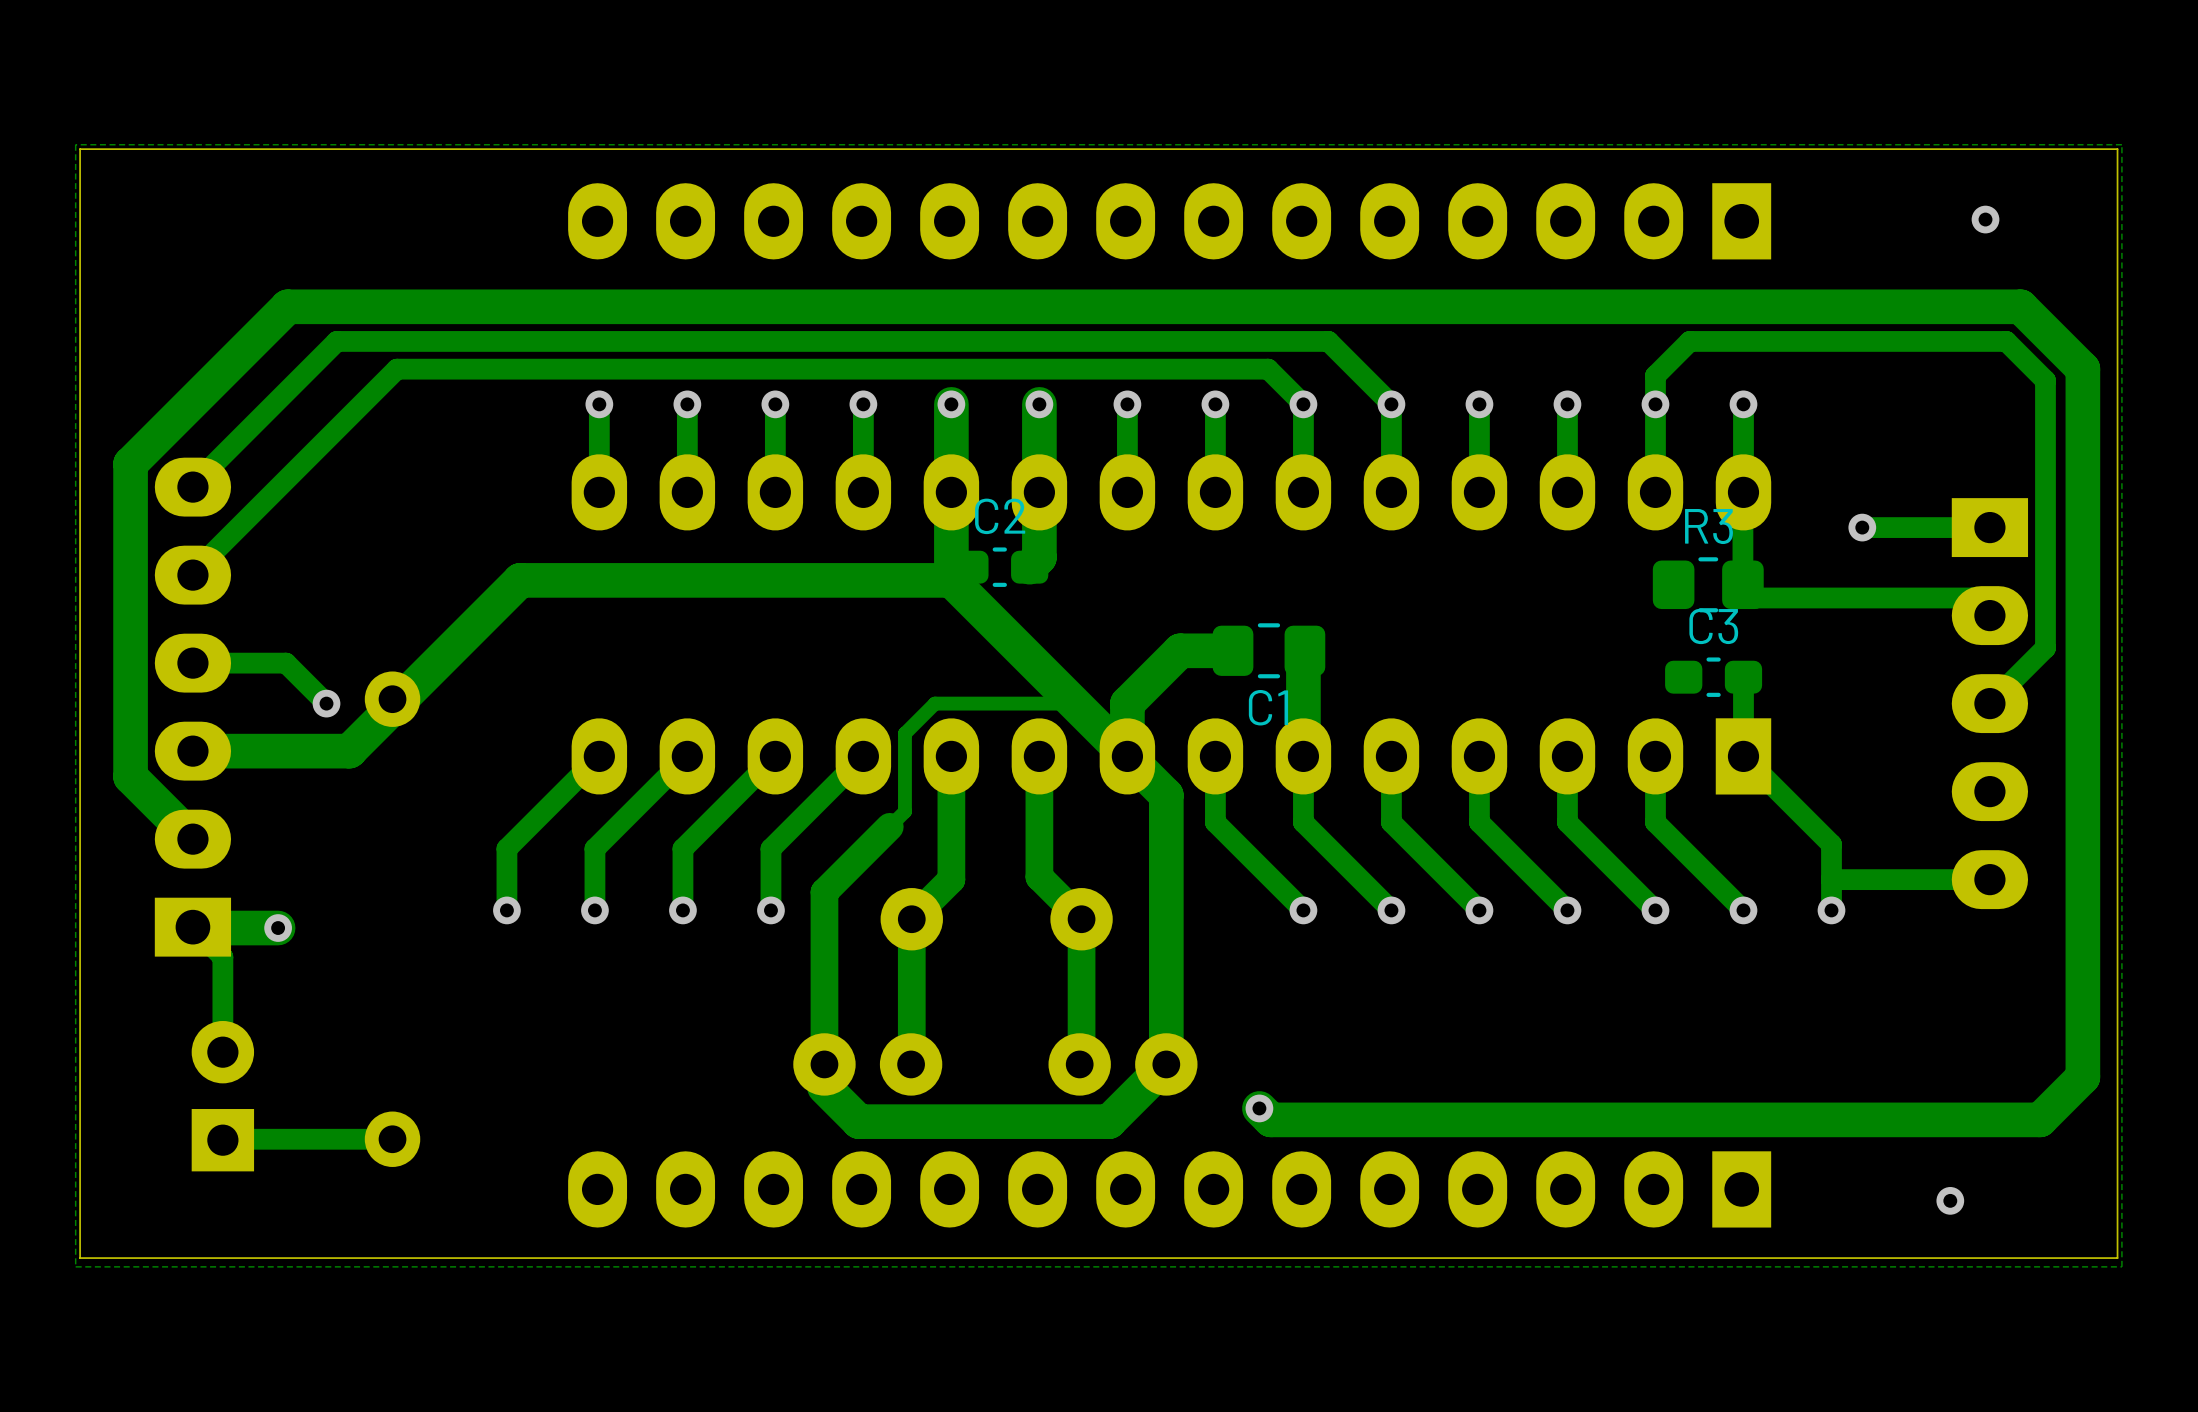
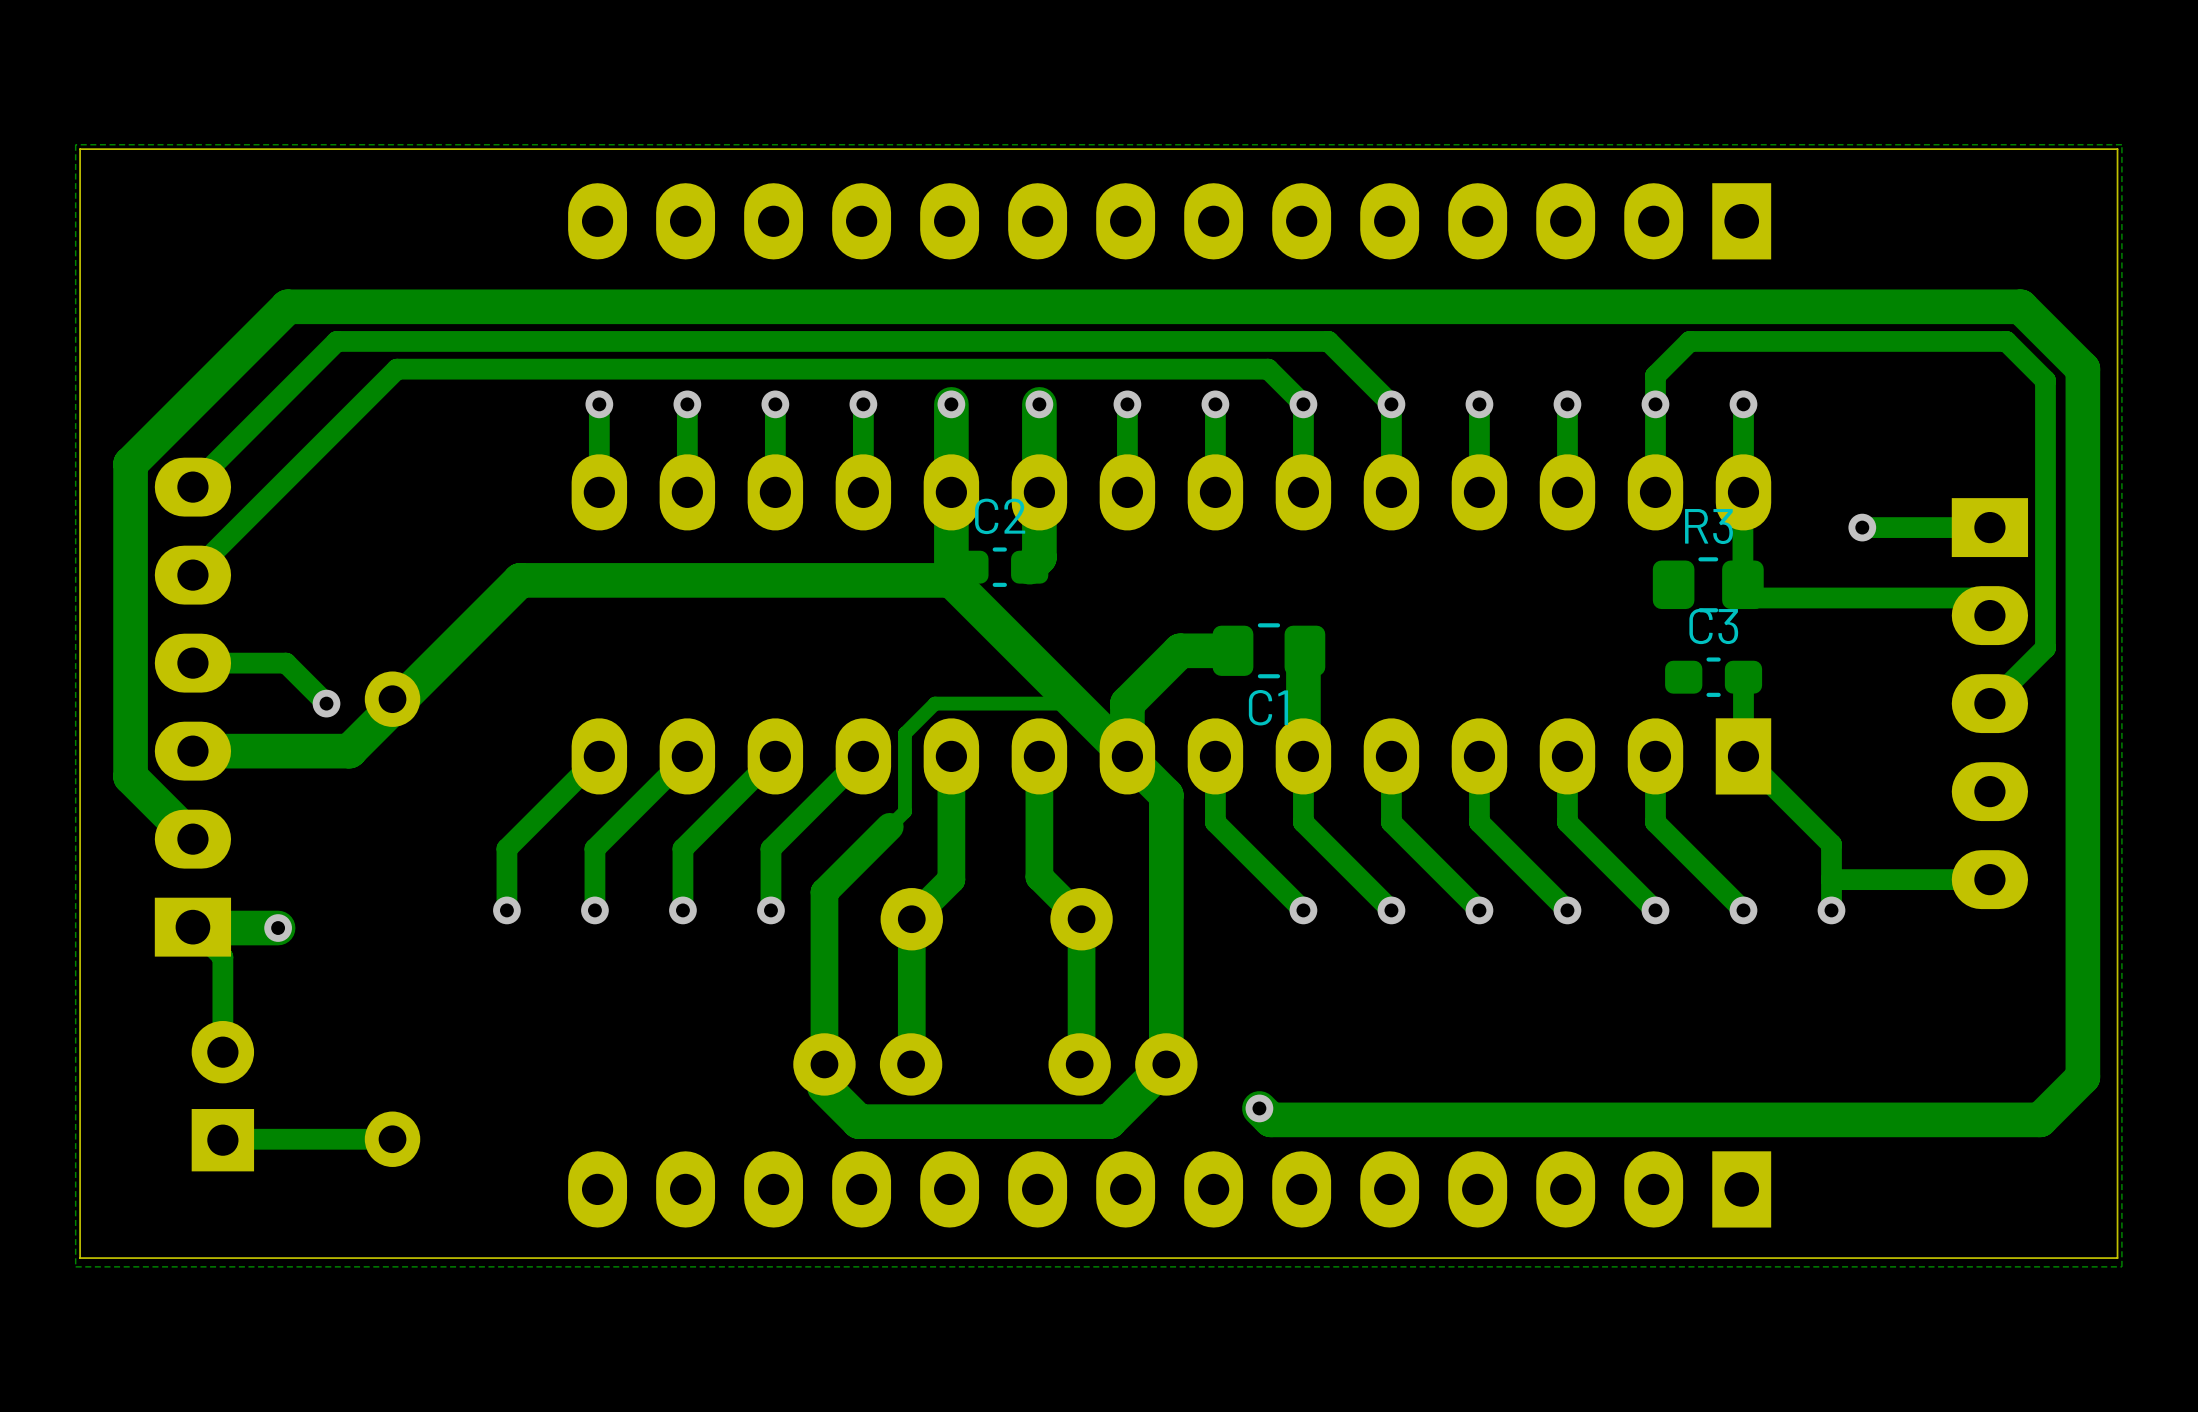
via: (1985, 219) -> none
via: (1950, 1200) -> none

